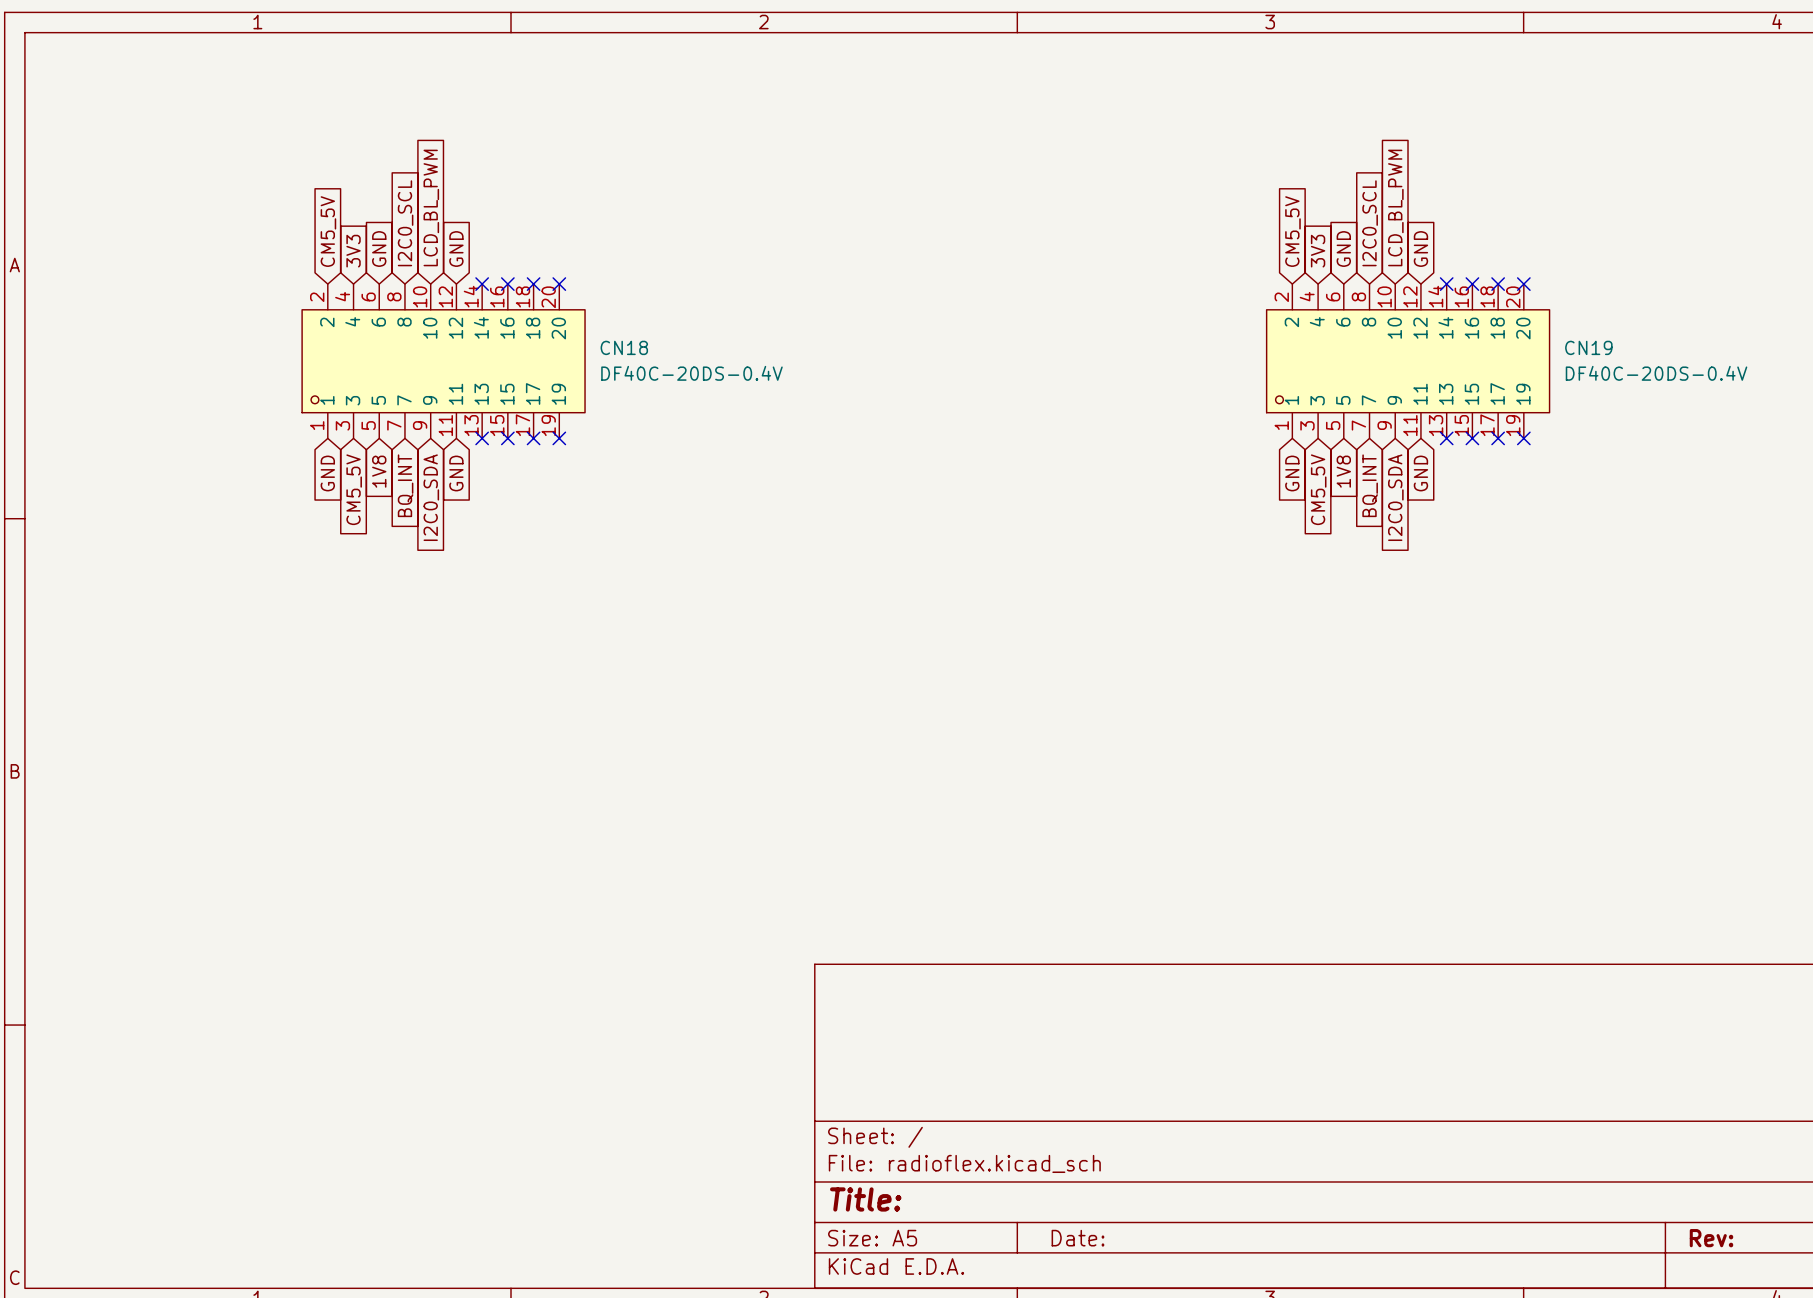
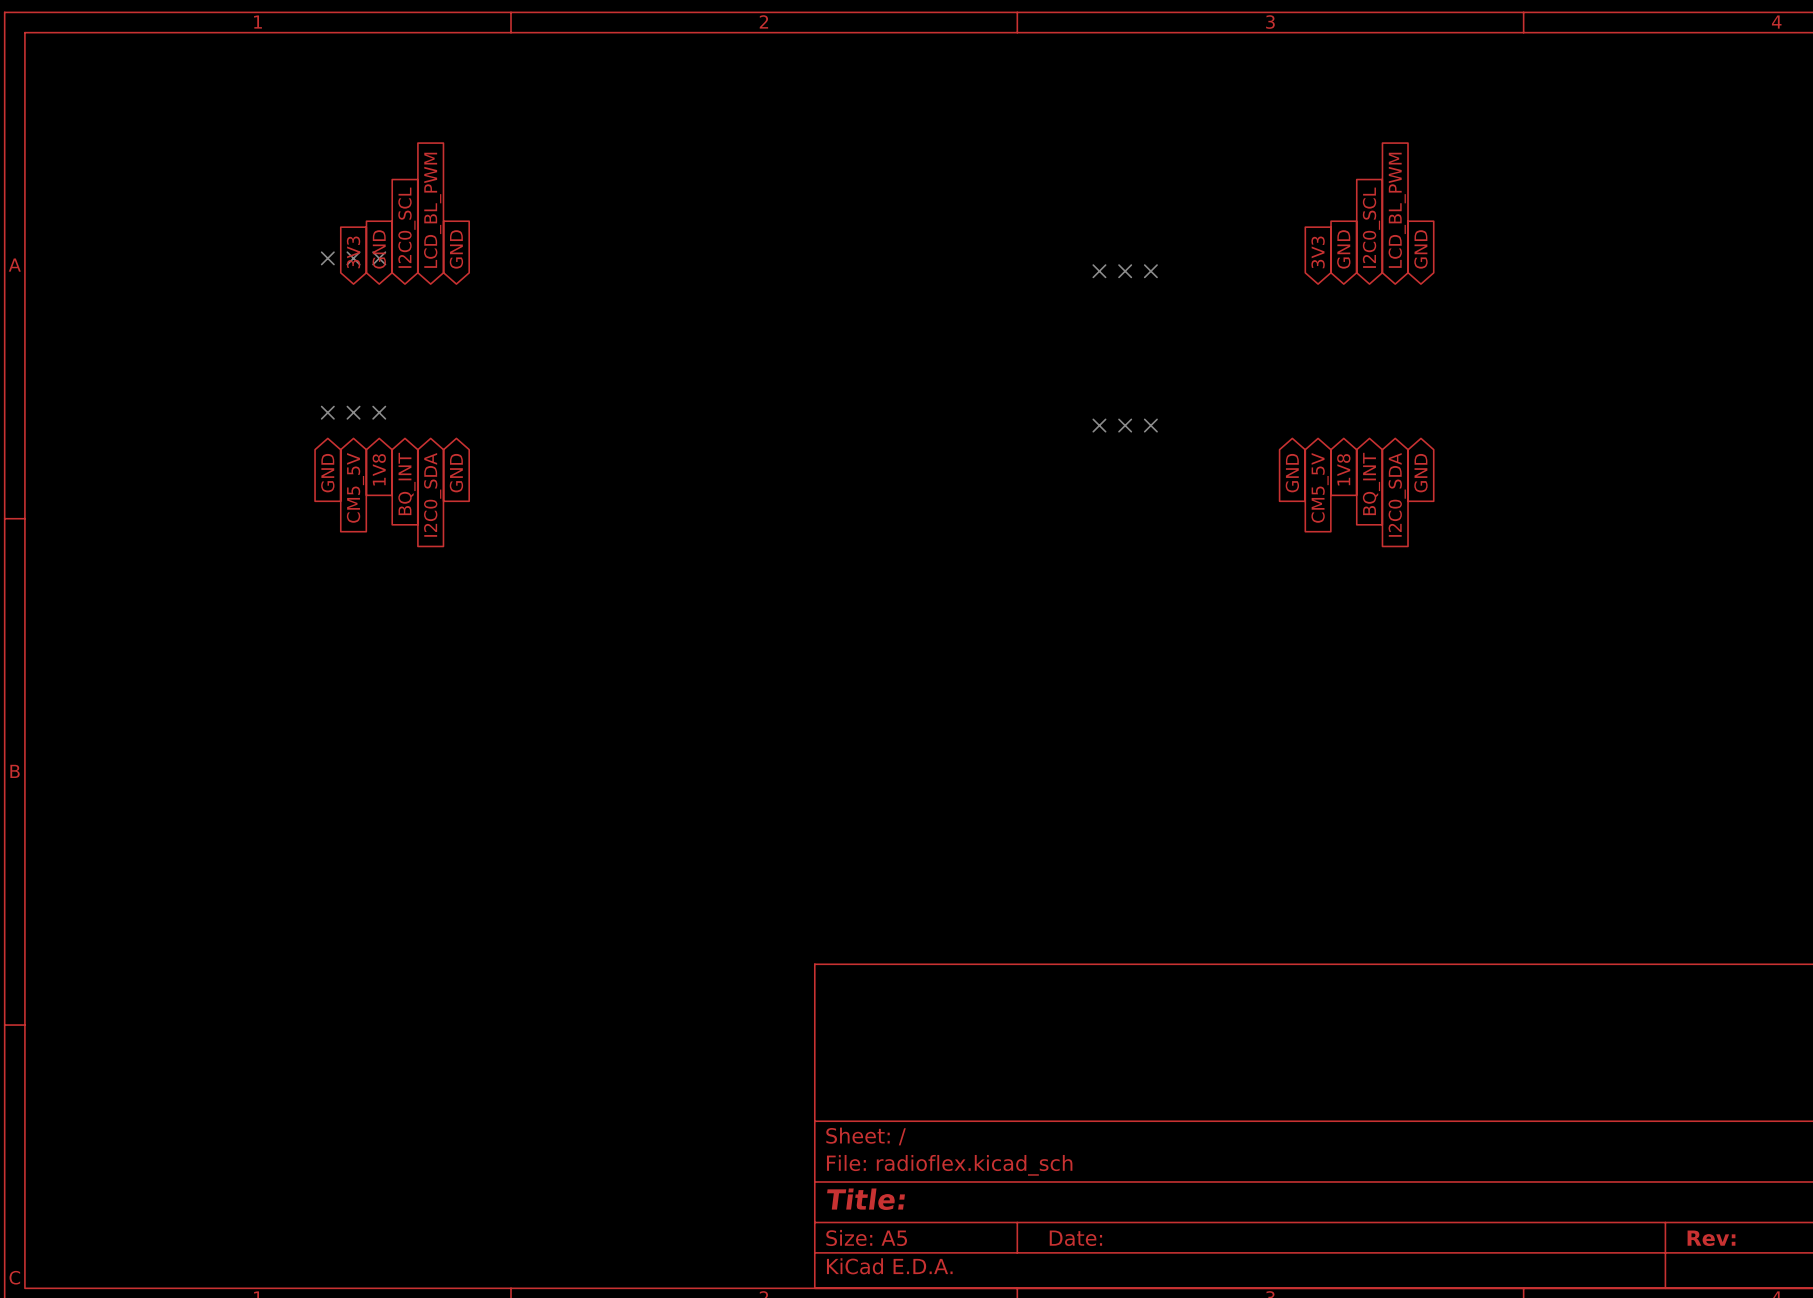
global label: CM5_5V (328, 231) -> none
global label: CM5_5V (1292, 231) -> none
no-connect mark: none -> (327, 258)
no-connect mark: none -> (353, 258)
no-connect mark: none -> (379, 258)
no-connect mark: none -> (1099, 271)
no-connect mark: none -> (1125, 271)
no-connect mark: none -> (1150, 271)
no-connect mark: (482, 284) -> none
no-connect mark: (507, 284) -> none
no-connect mark: (533, 284) -> none
no-connect mark: (559, 284) -> none
no-connect mark: (1446, 284) -> none
no-connect mark: (1472, 284) -> none
no-connect mark: (1498, 284) -> none
no-connect mark: (1523, 284) -> none
CN18: DF40C-20DS-0.4V (443, 361) -> none
CN19: DF40C-20DS-0.4V (1408, 361) -> none
no-connect mark: none -> (327, 412)
no-connect mark: none -> (353, 412)
no-connect mark: none -> (379, 412)
no-connect mark: none -> (1099, 425)
no-connect mark: none -> (1125, 425)
no-connect mark: none -> (1150, 425)
no-connect mark: (482, 438) -> none
no-connect mark: (507, 438) -> none
no-connect mark: (533, 438) -> none
no-connect mark: (559, 438) -> none
no-connect mark: (1446, 438) -> none
no-connect mark: (1472, 438) -> none
no-connect mark: (1498, 438) -> none
no-connect mark: (1523, 438) -> none

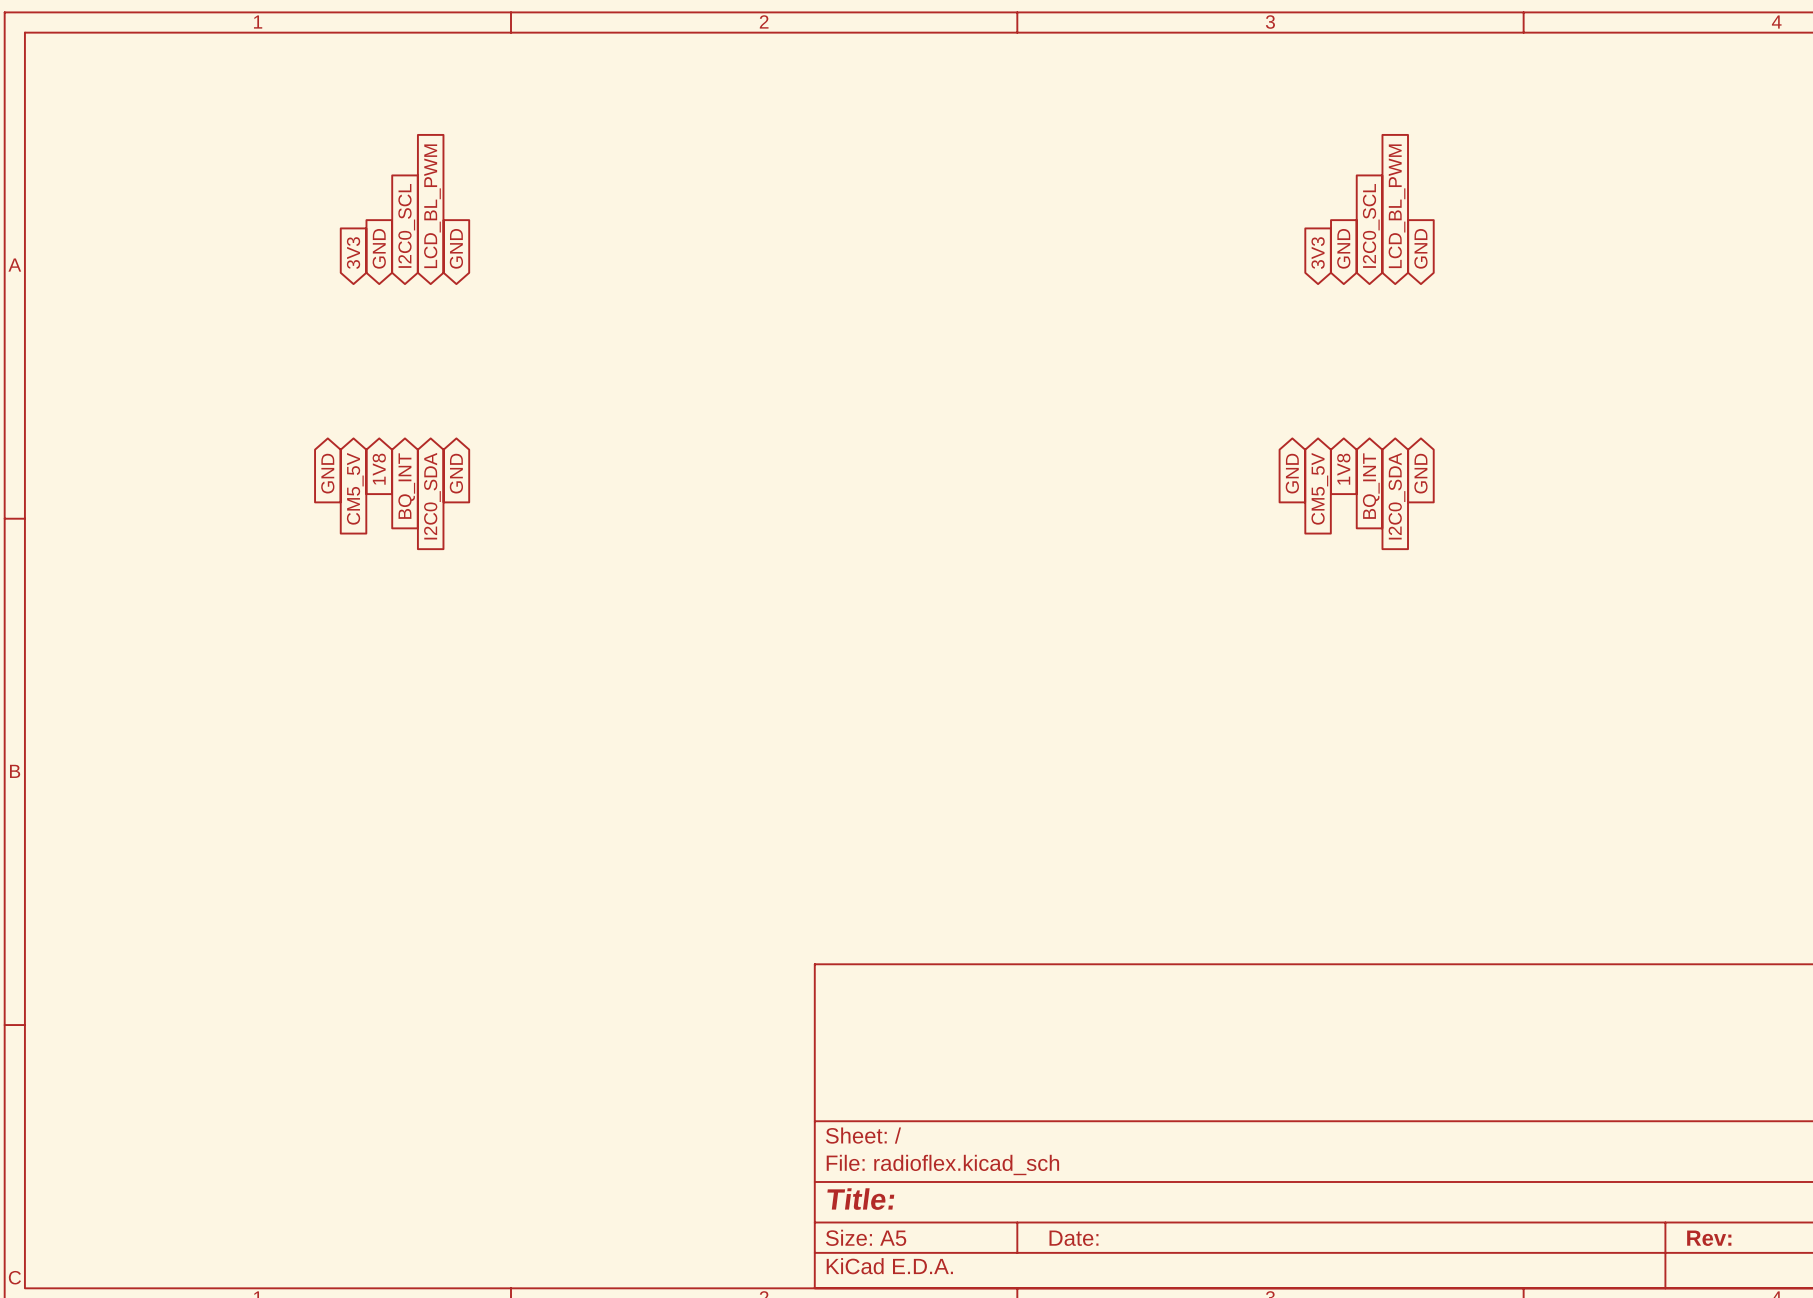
no-connect mark: (327, 258) -> none
no-connect mark: (353, 258) -> none
no-connect mark: (379, 258) -> none
no-connect mark: (1099, 271) -> none
no-connect mark: (1125, 271) -> none
no-connect mark: (1150, 271) -> none
no-connect mark: (327, 412) -> none
no-connect mark: (353, 412) -> none
no-connect mark: (379, 412) -> none
no-connect mark: (1099, 425) -> none
no-connect mark: (1125, 425) -> none
no-connect mark: (1150, 425) -> none

